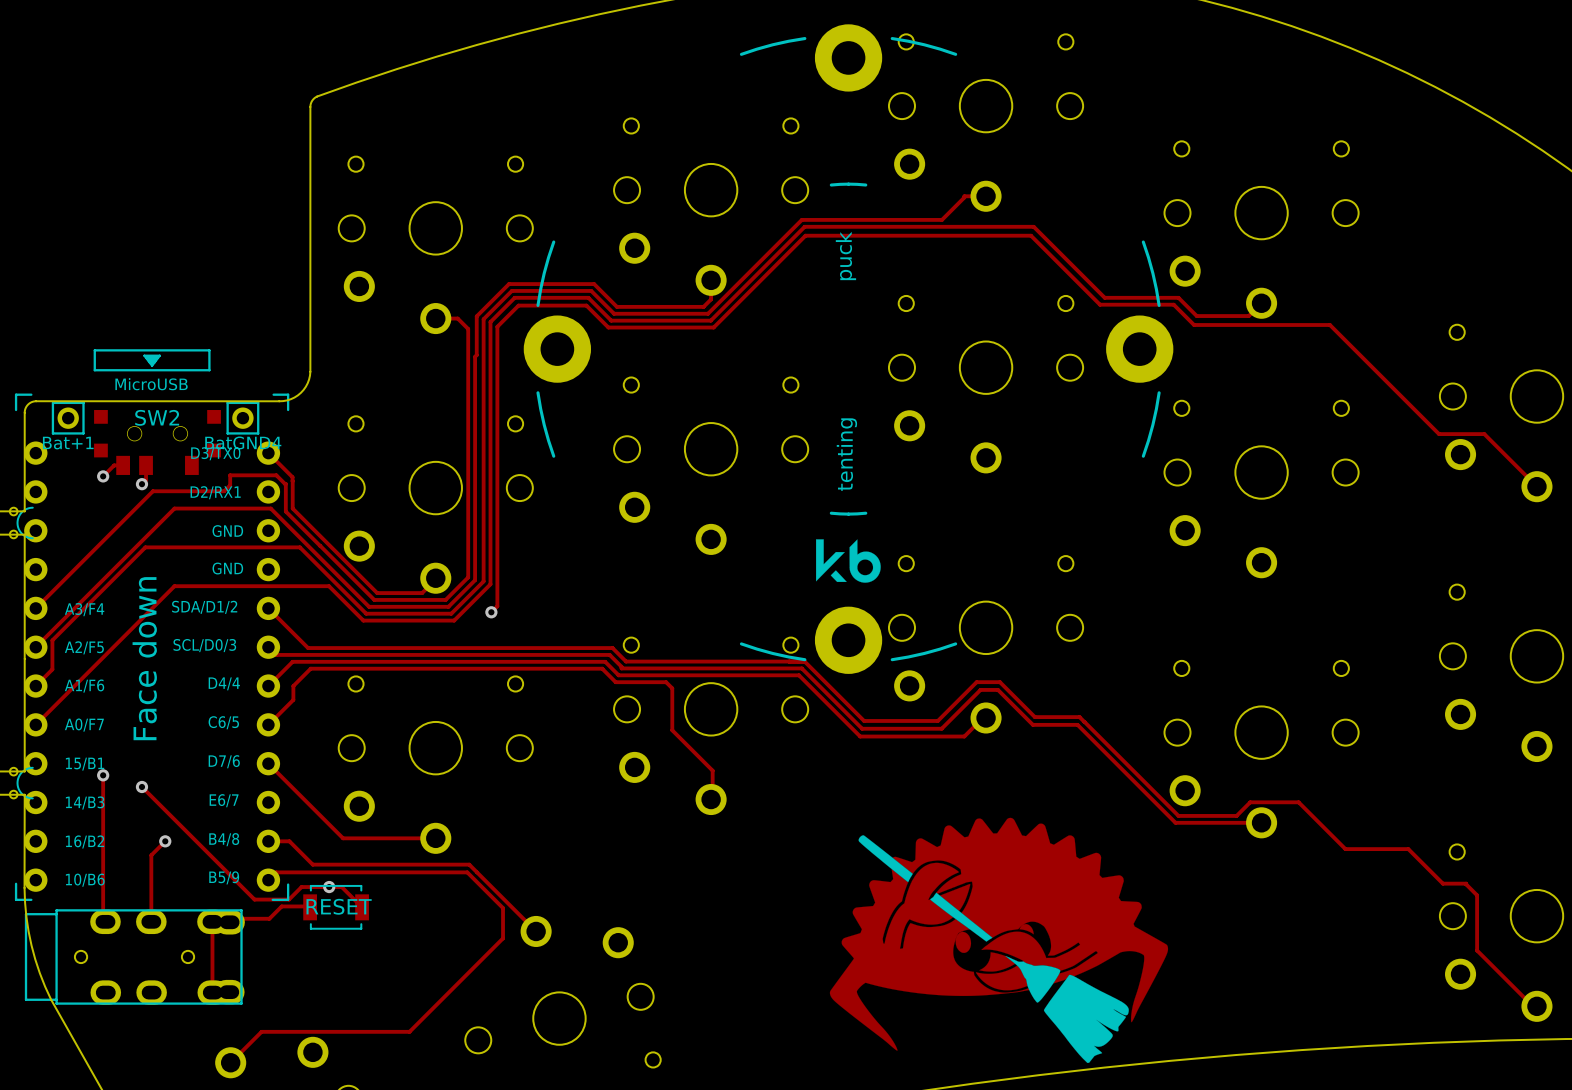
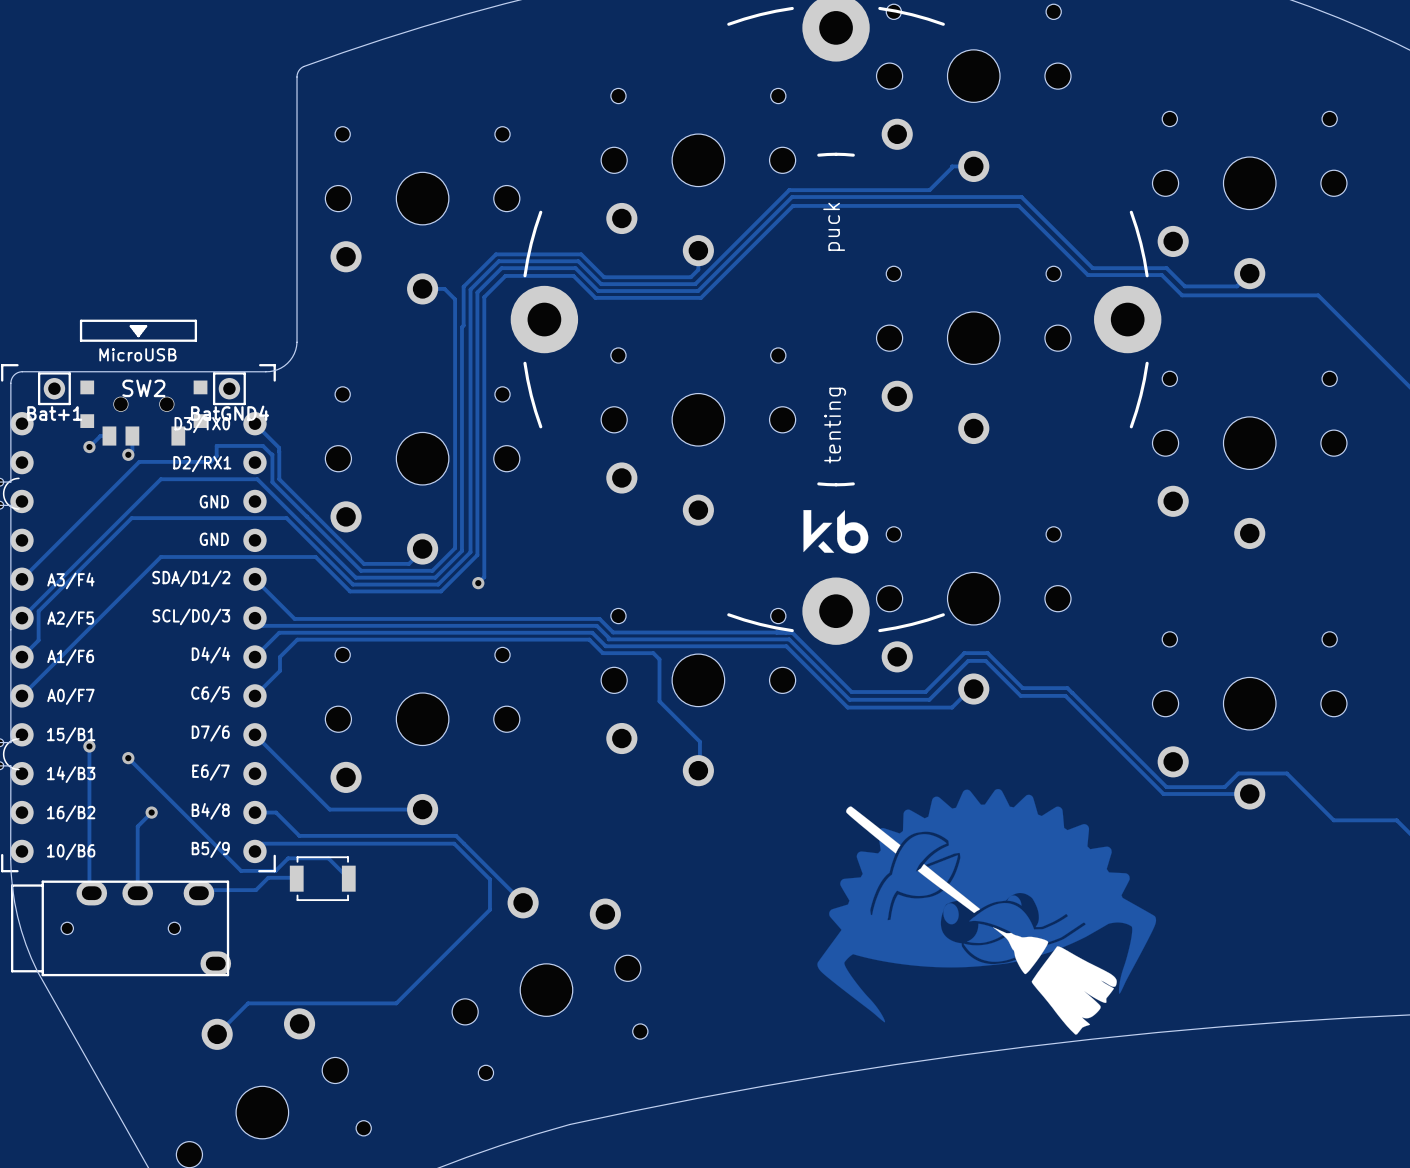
text: Face down (144, 658) -> none
via: (329, 887) -> none
part: (339, 906) -> none
part footprint: [24, 909, 245, 1005] -> [11, 880, 232, 977]
track: (212, 921) (212, 992) -> none

